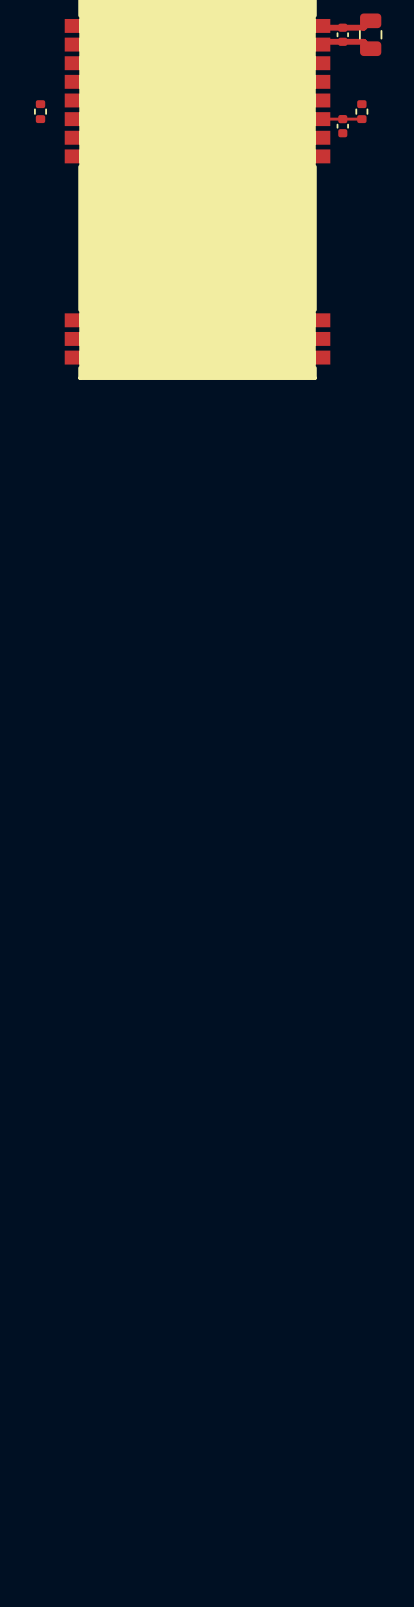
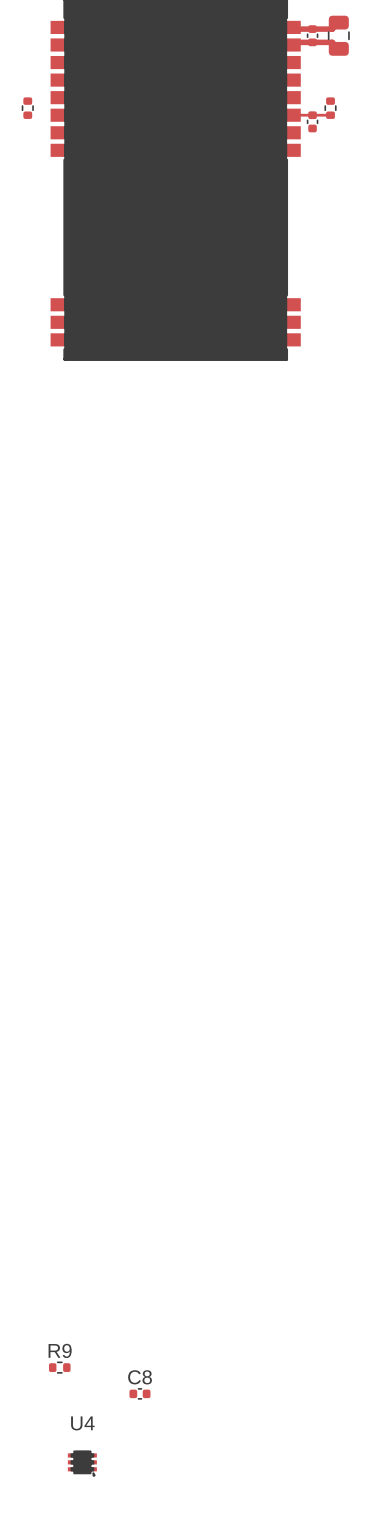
R9: none -> (59, 1367)
C8: none -> (139, 1393)
U4: none -> (82, 1463)

